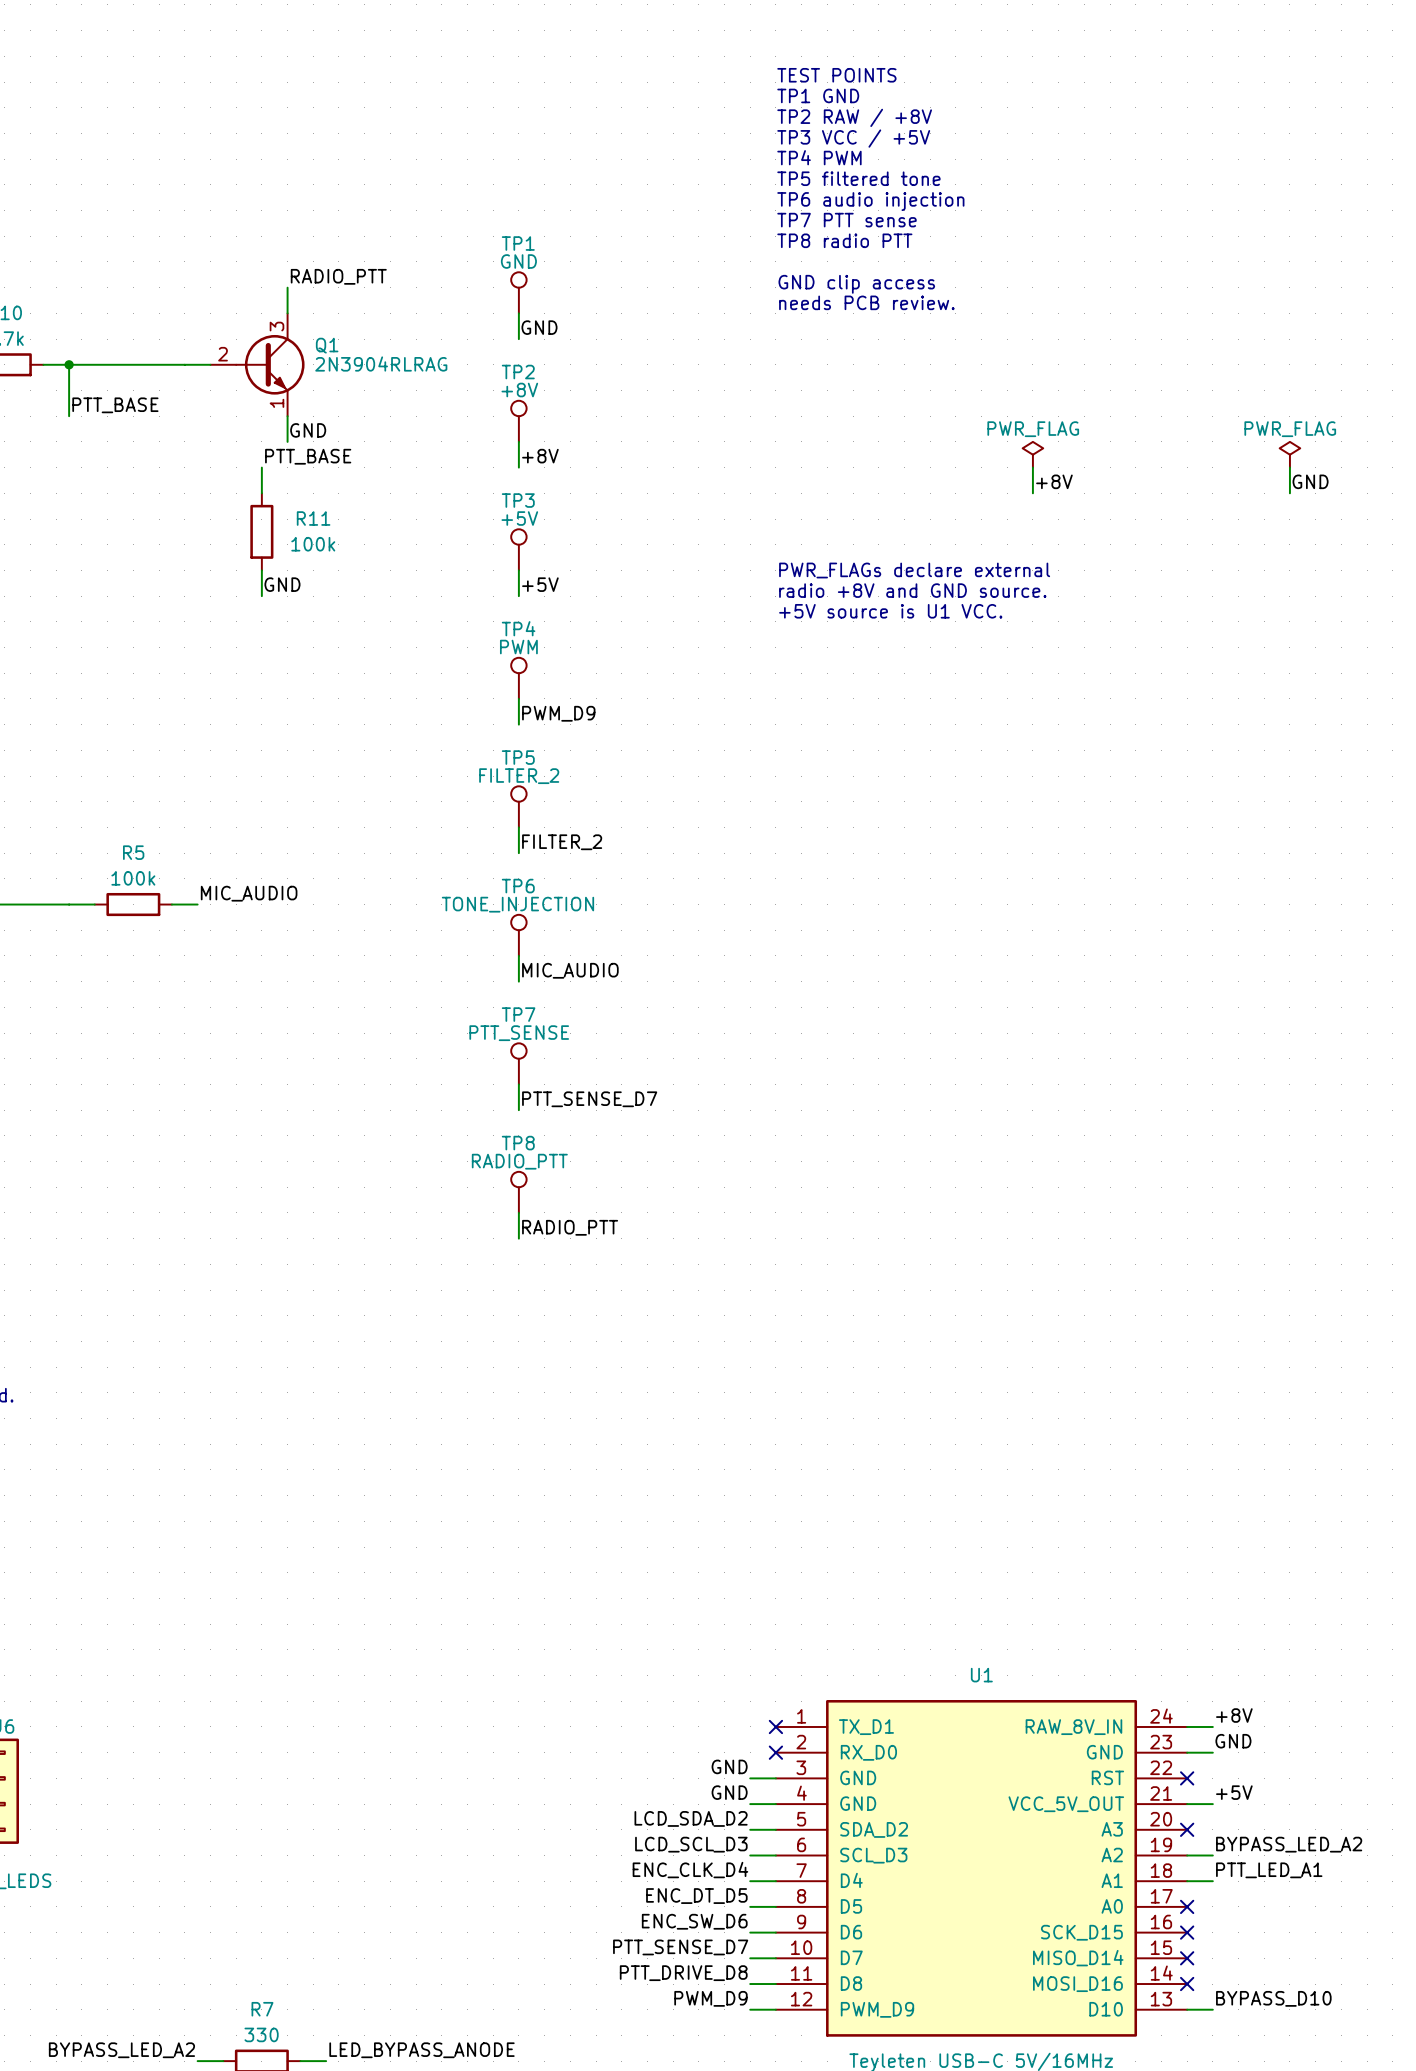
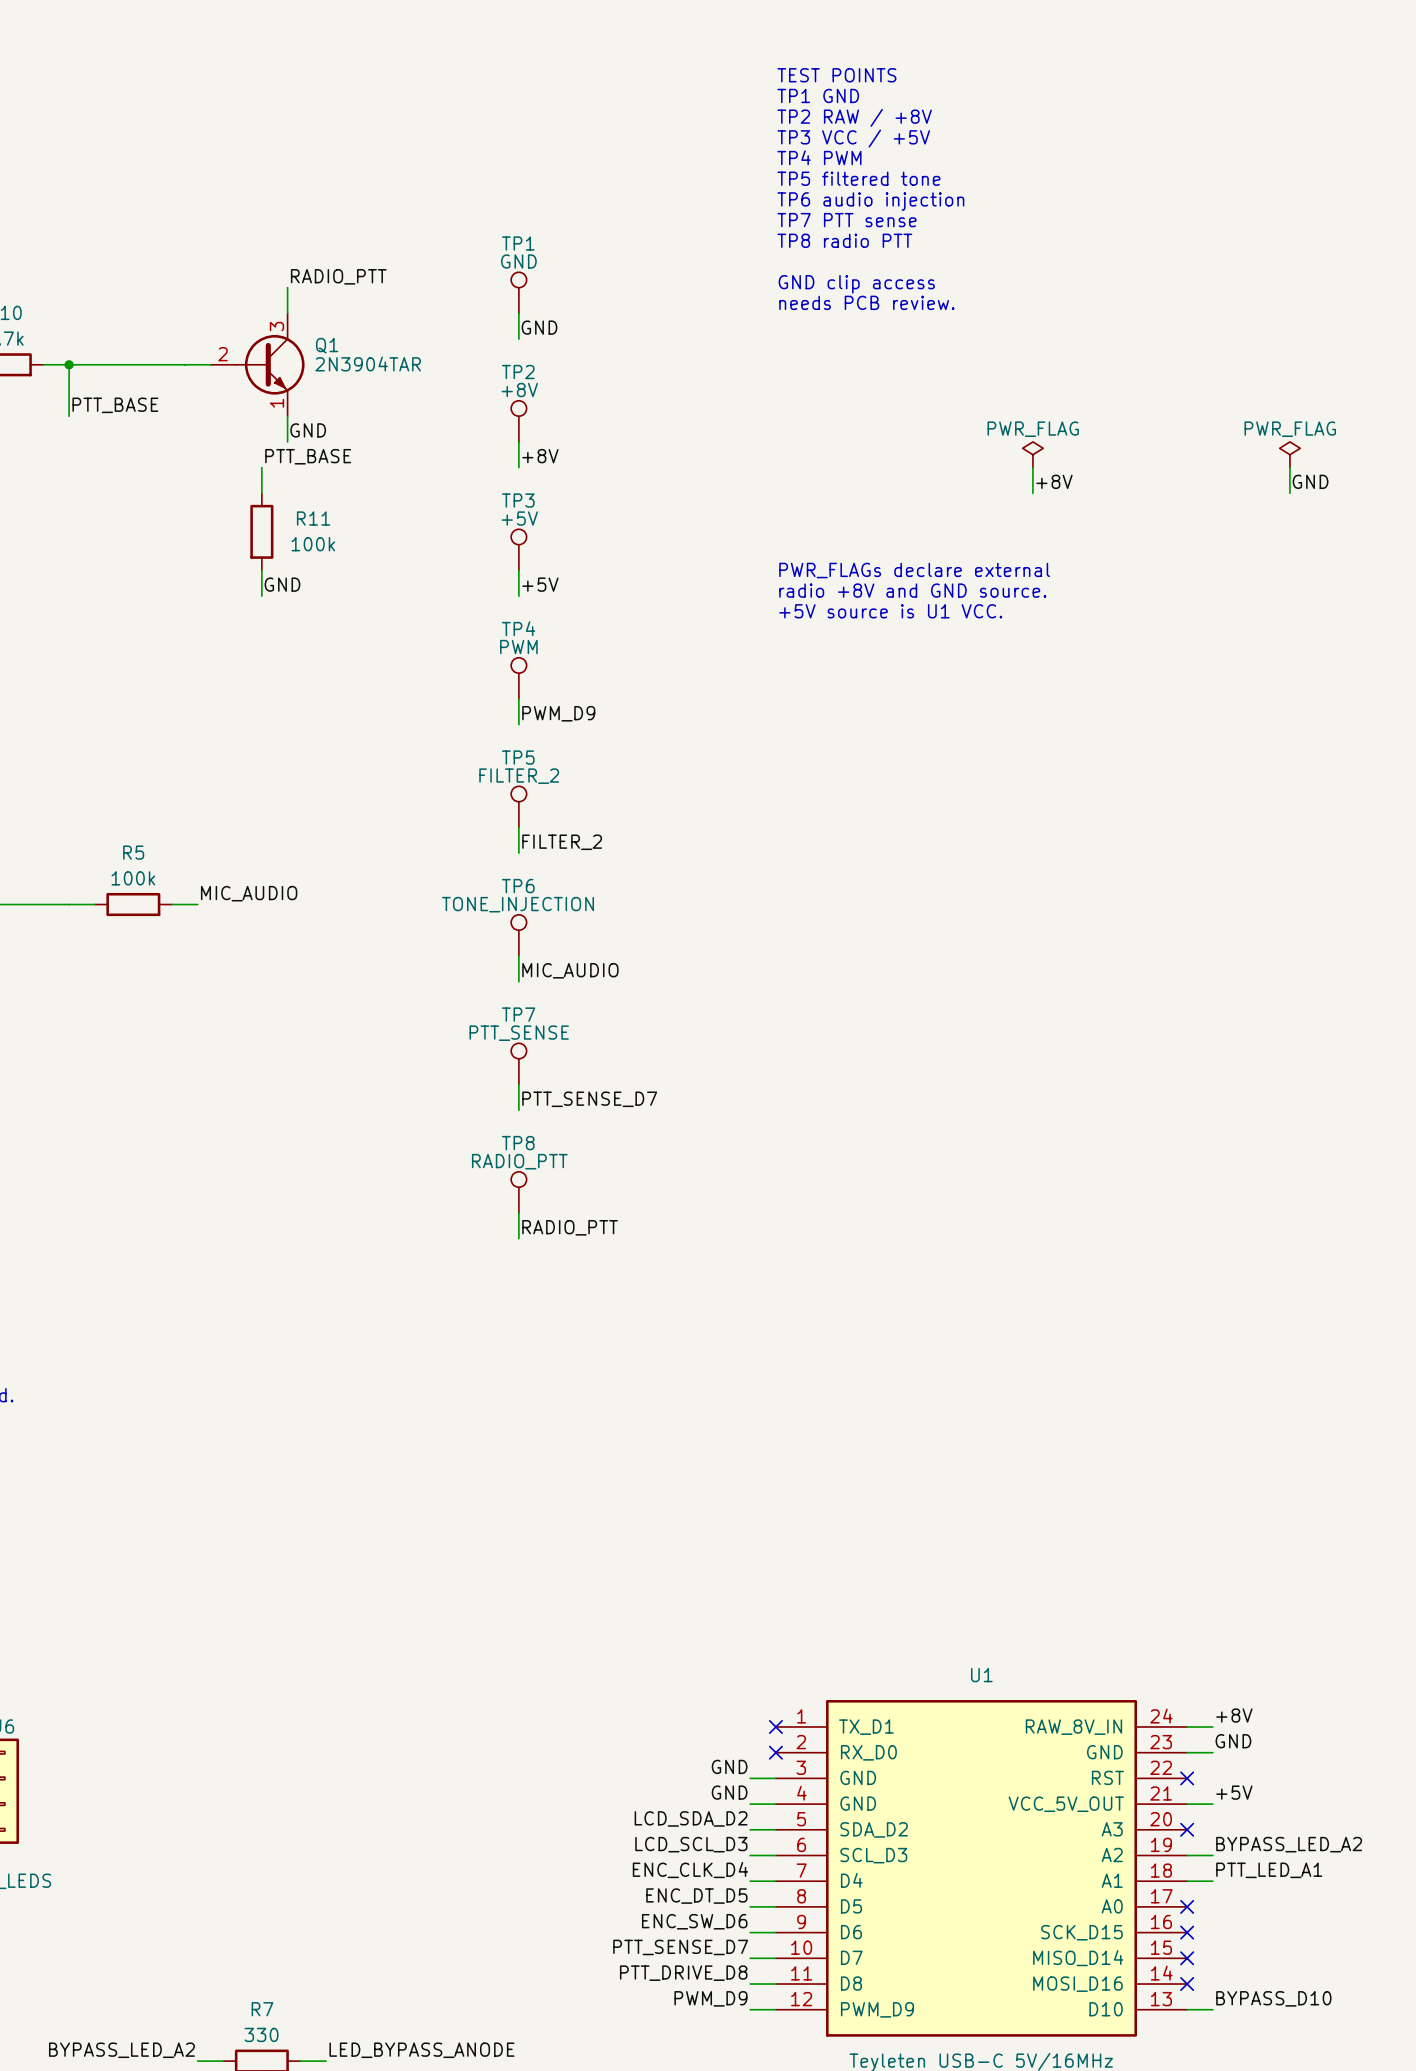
Q1 value: 2N3904RLRAG (381, 364) -> 2N3904TAR (368, 364)

